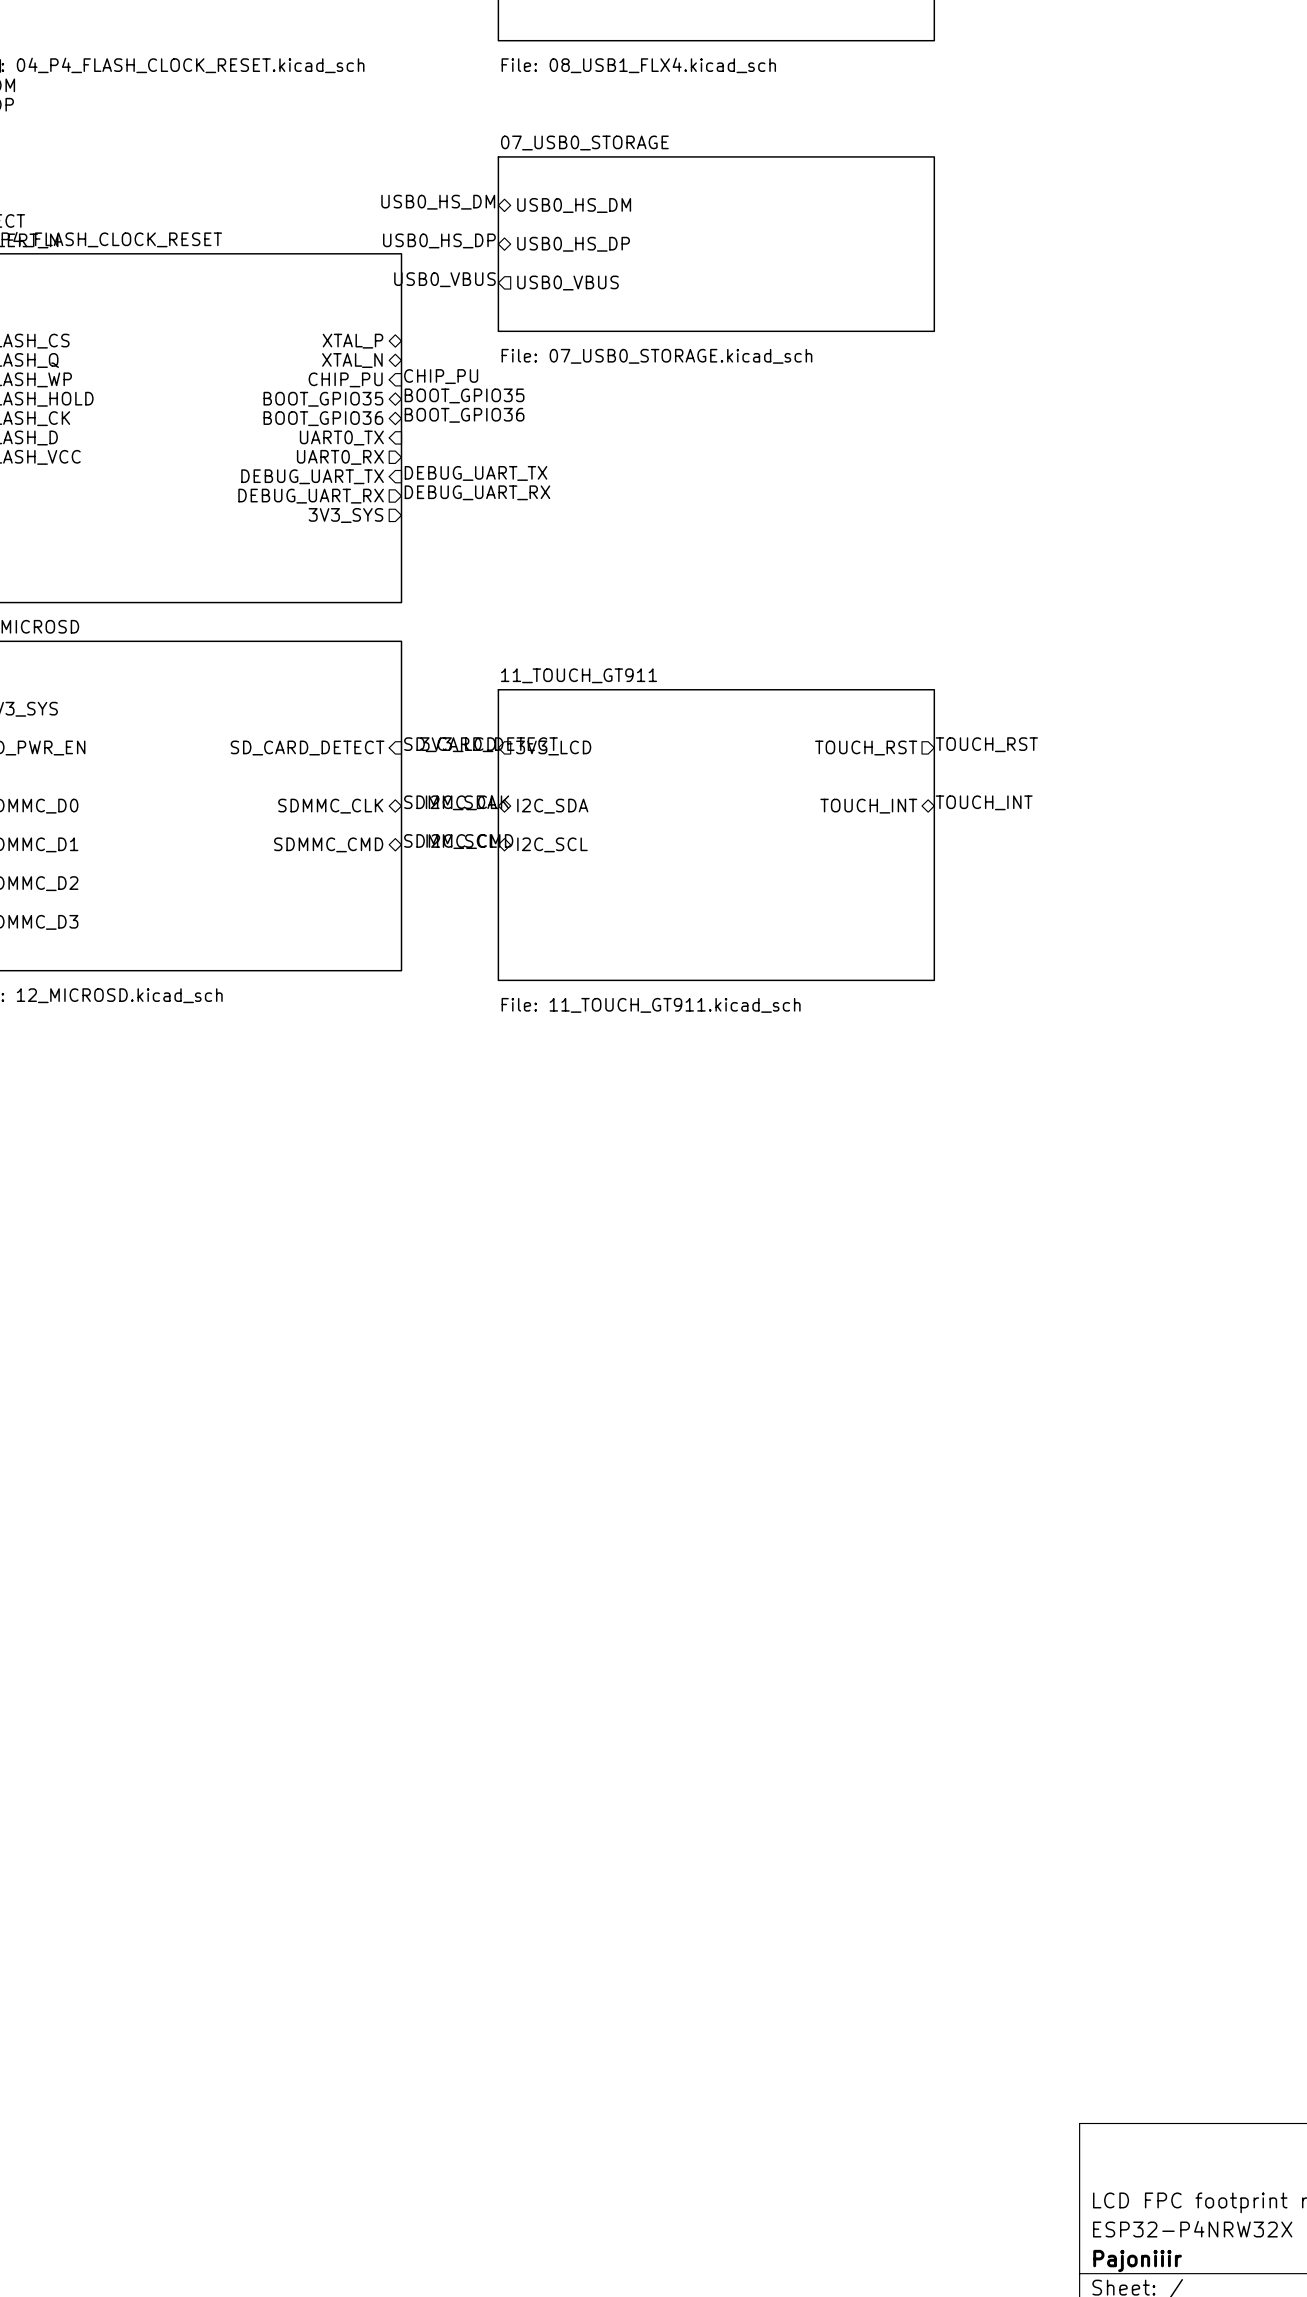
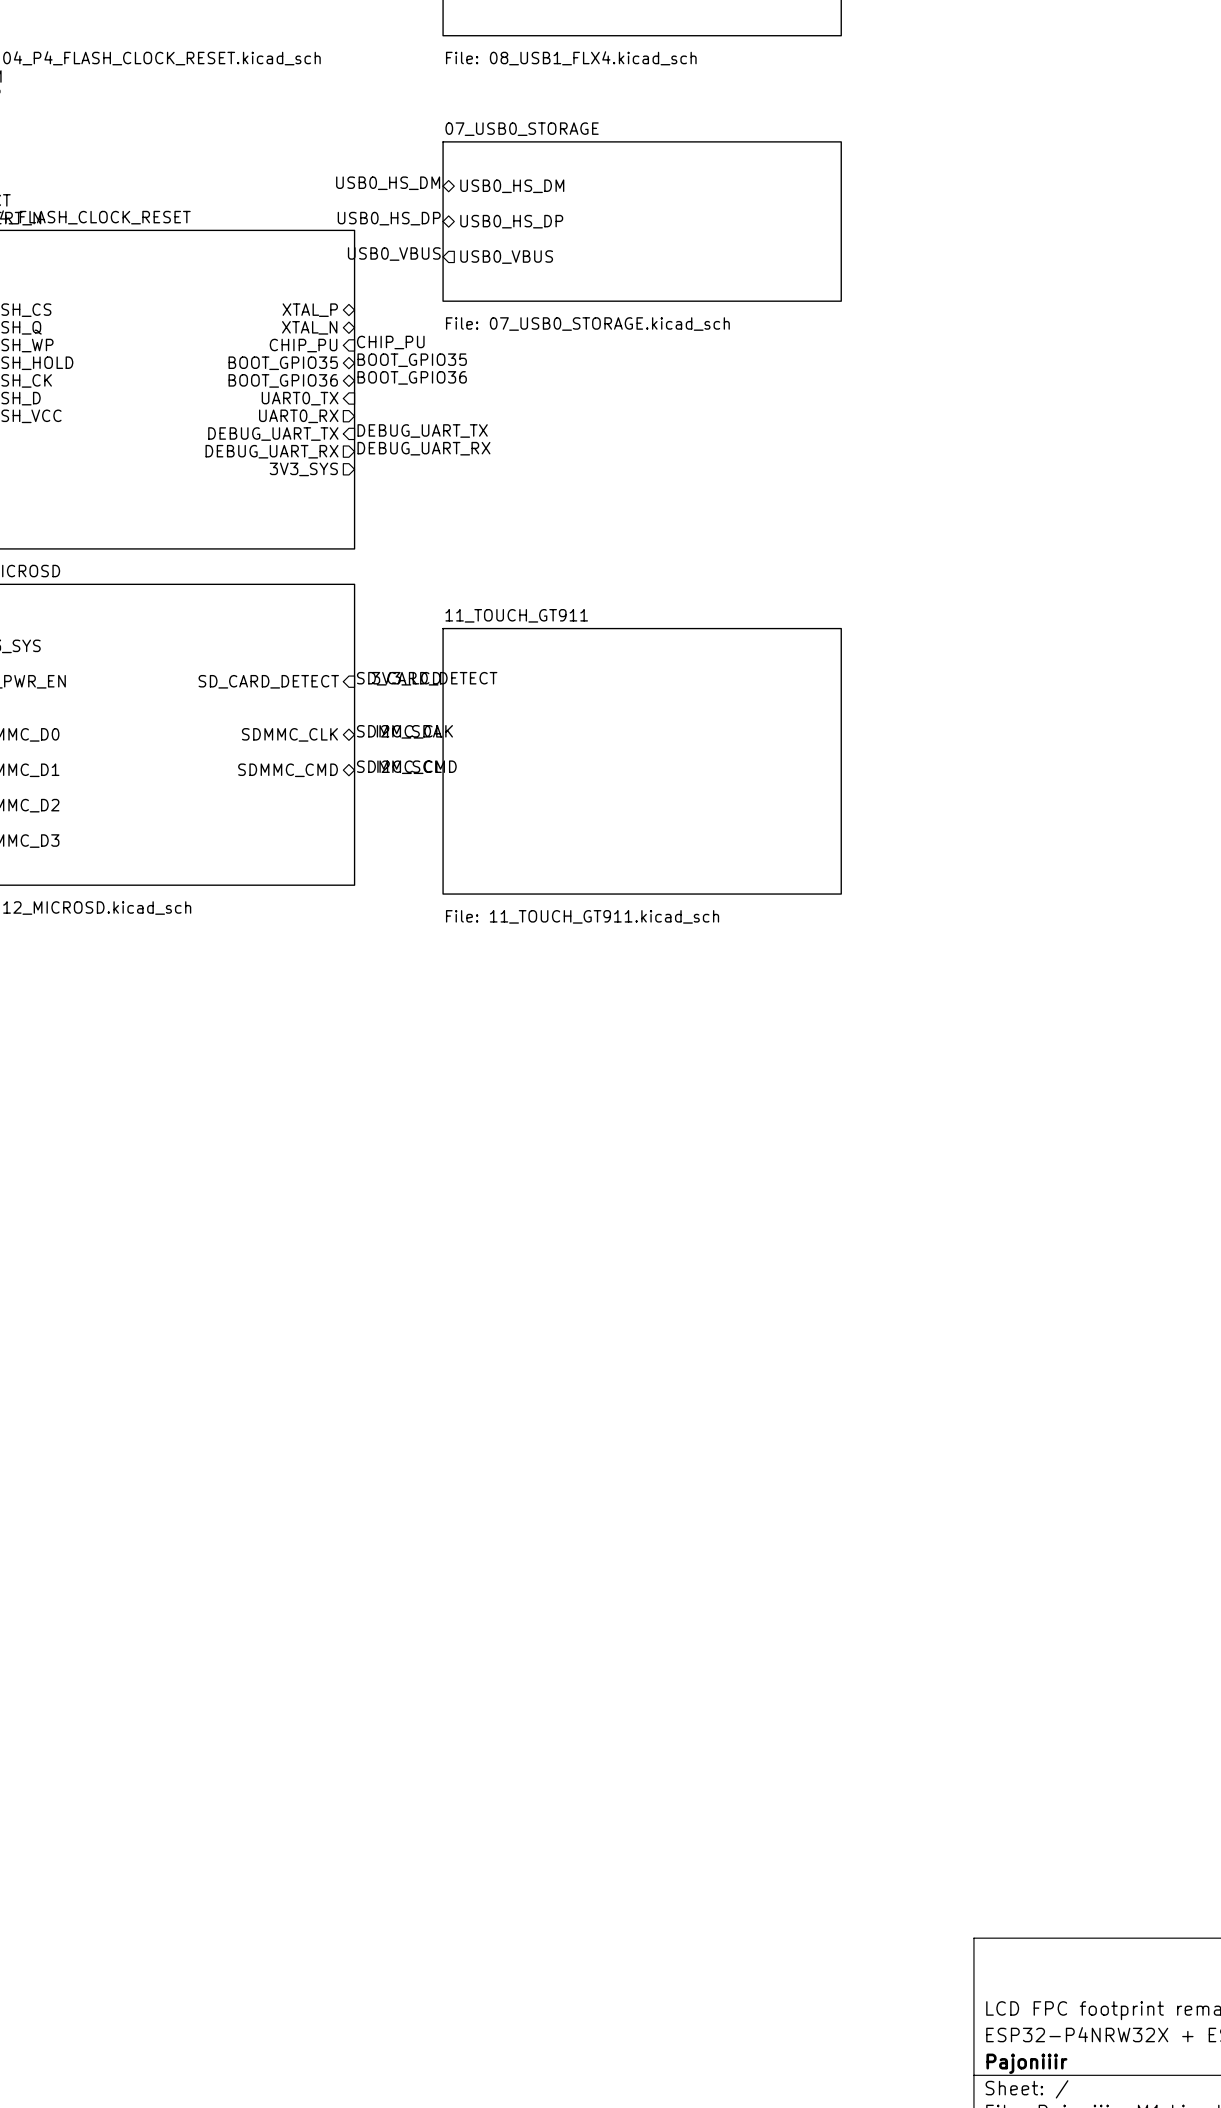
label: TOUCH_RST (986, 744) -> none
sheet pin: 3V3_LCD (553, 748) -> none
sheet pin: TOUCH_RST (866, 748) -> none
label: TOUCH_INT (984, 802) -> none
sheet pin: I2C_SDA (552, 806) -> none
sheet pin: TOUCH_INT (868, 806) -> none
sheet pin: I2C_SCL (552, 844) -> none

